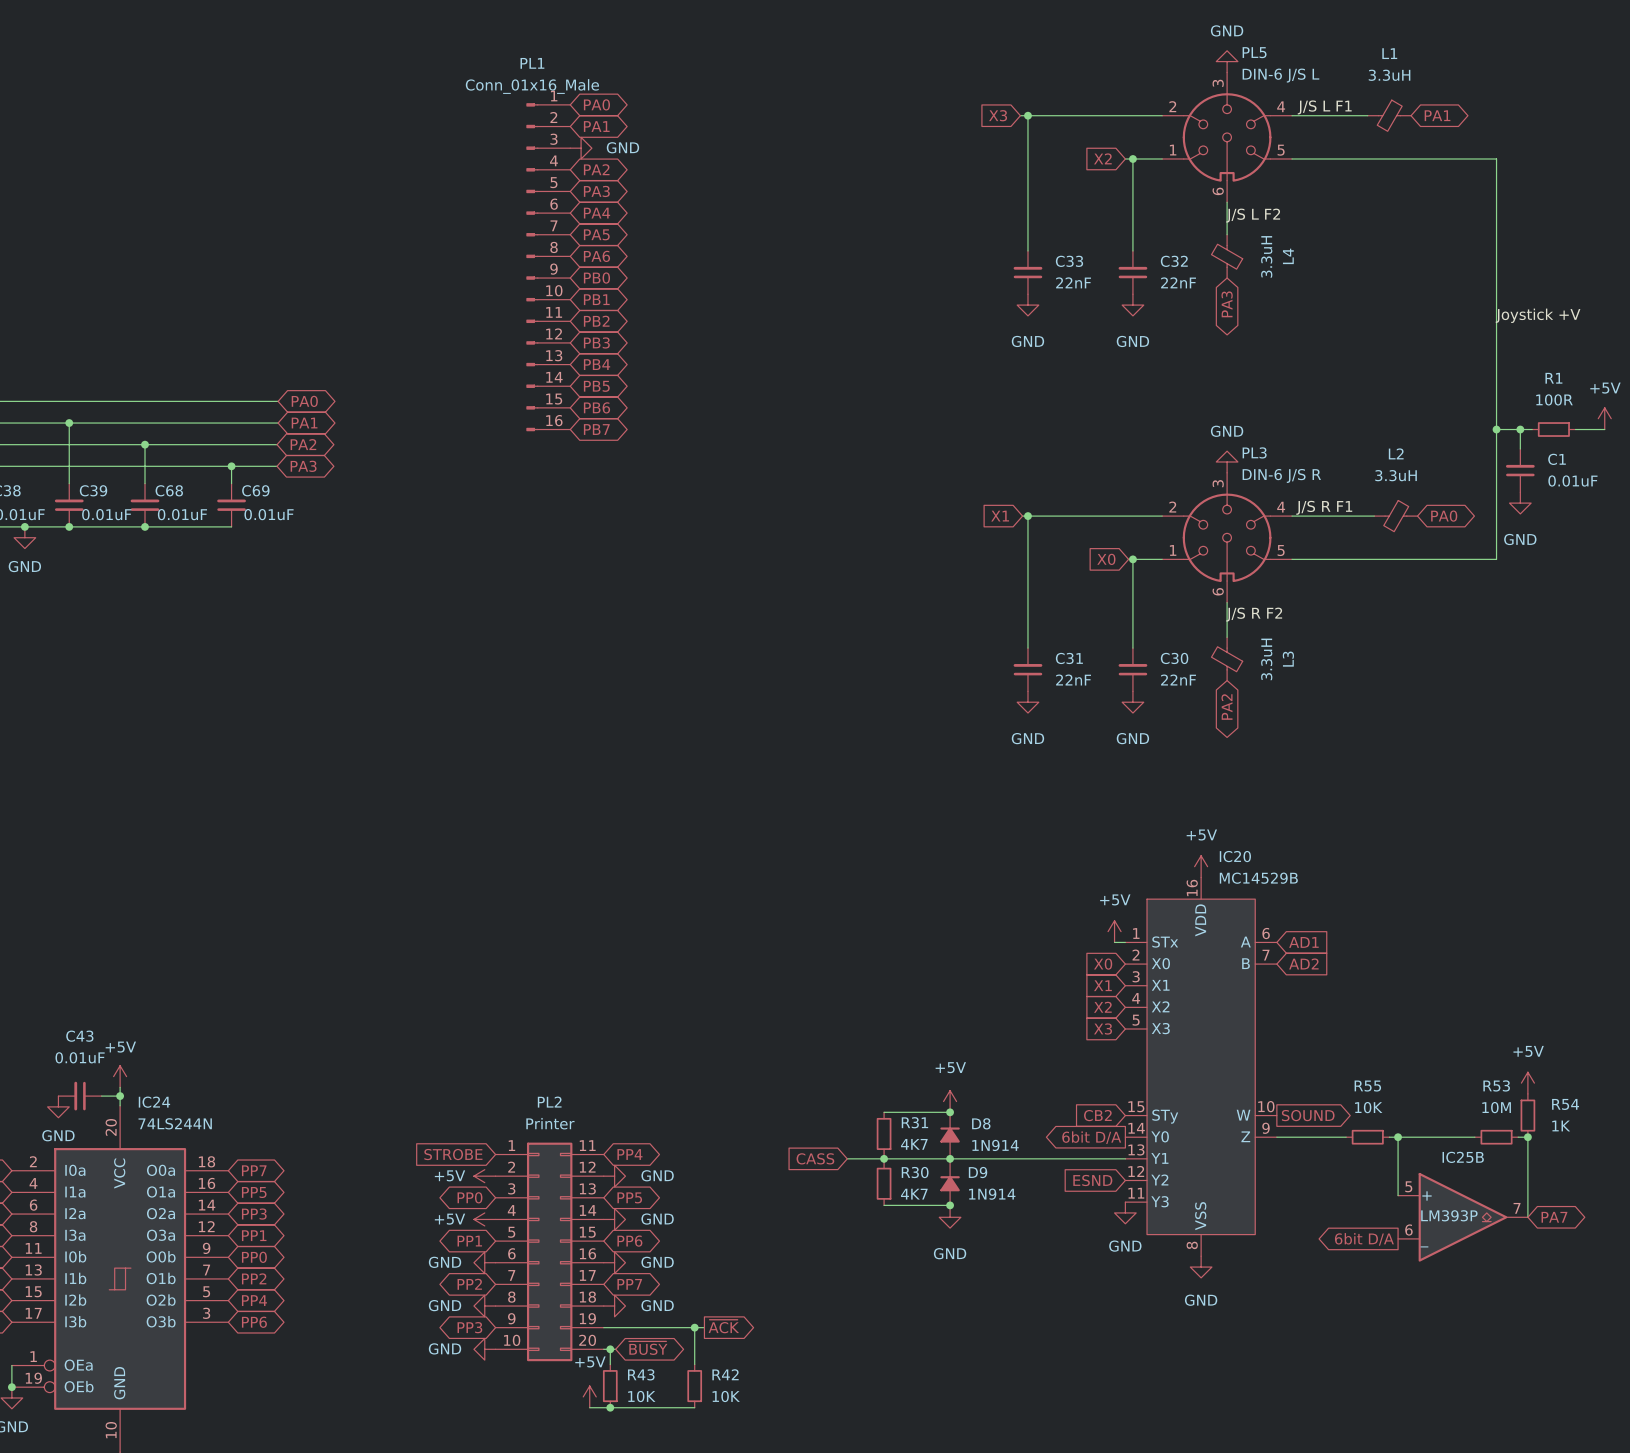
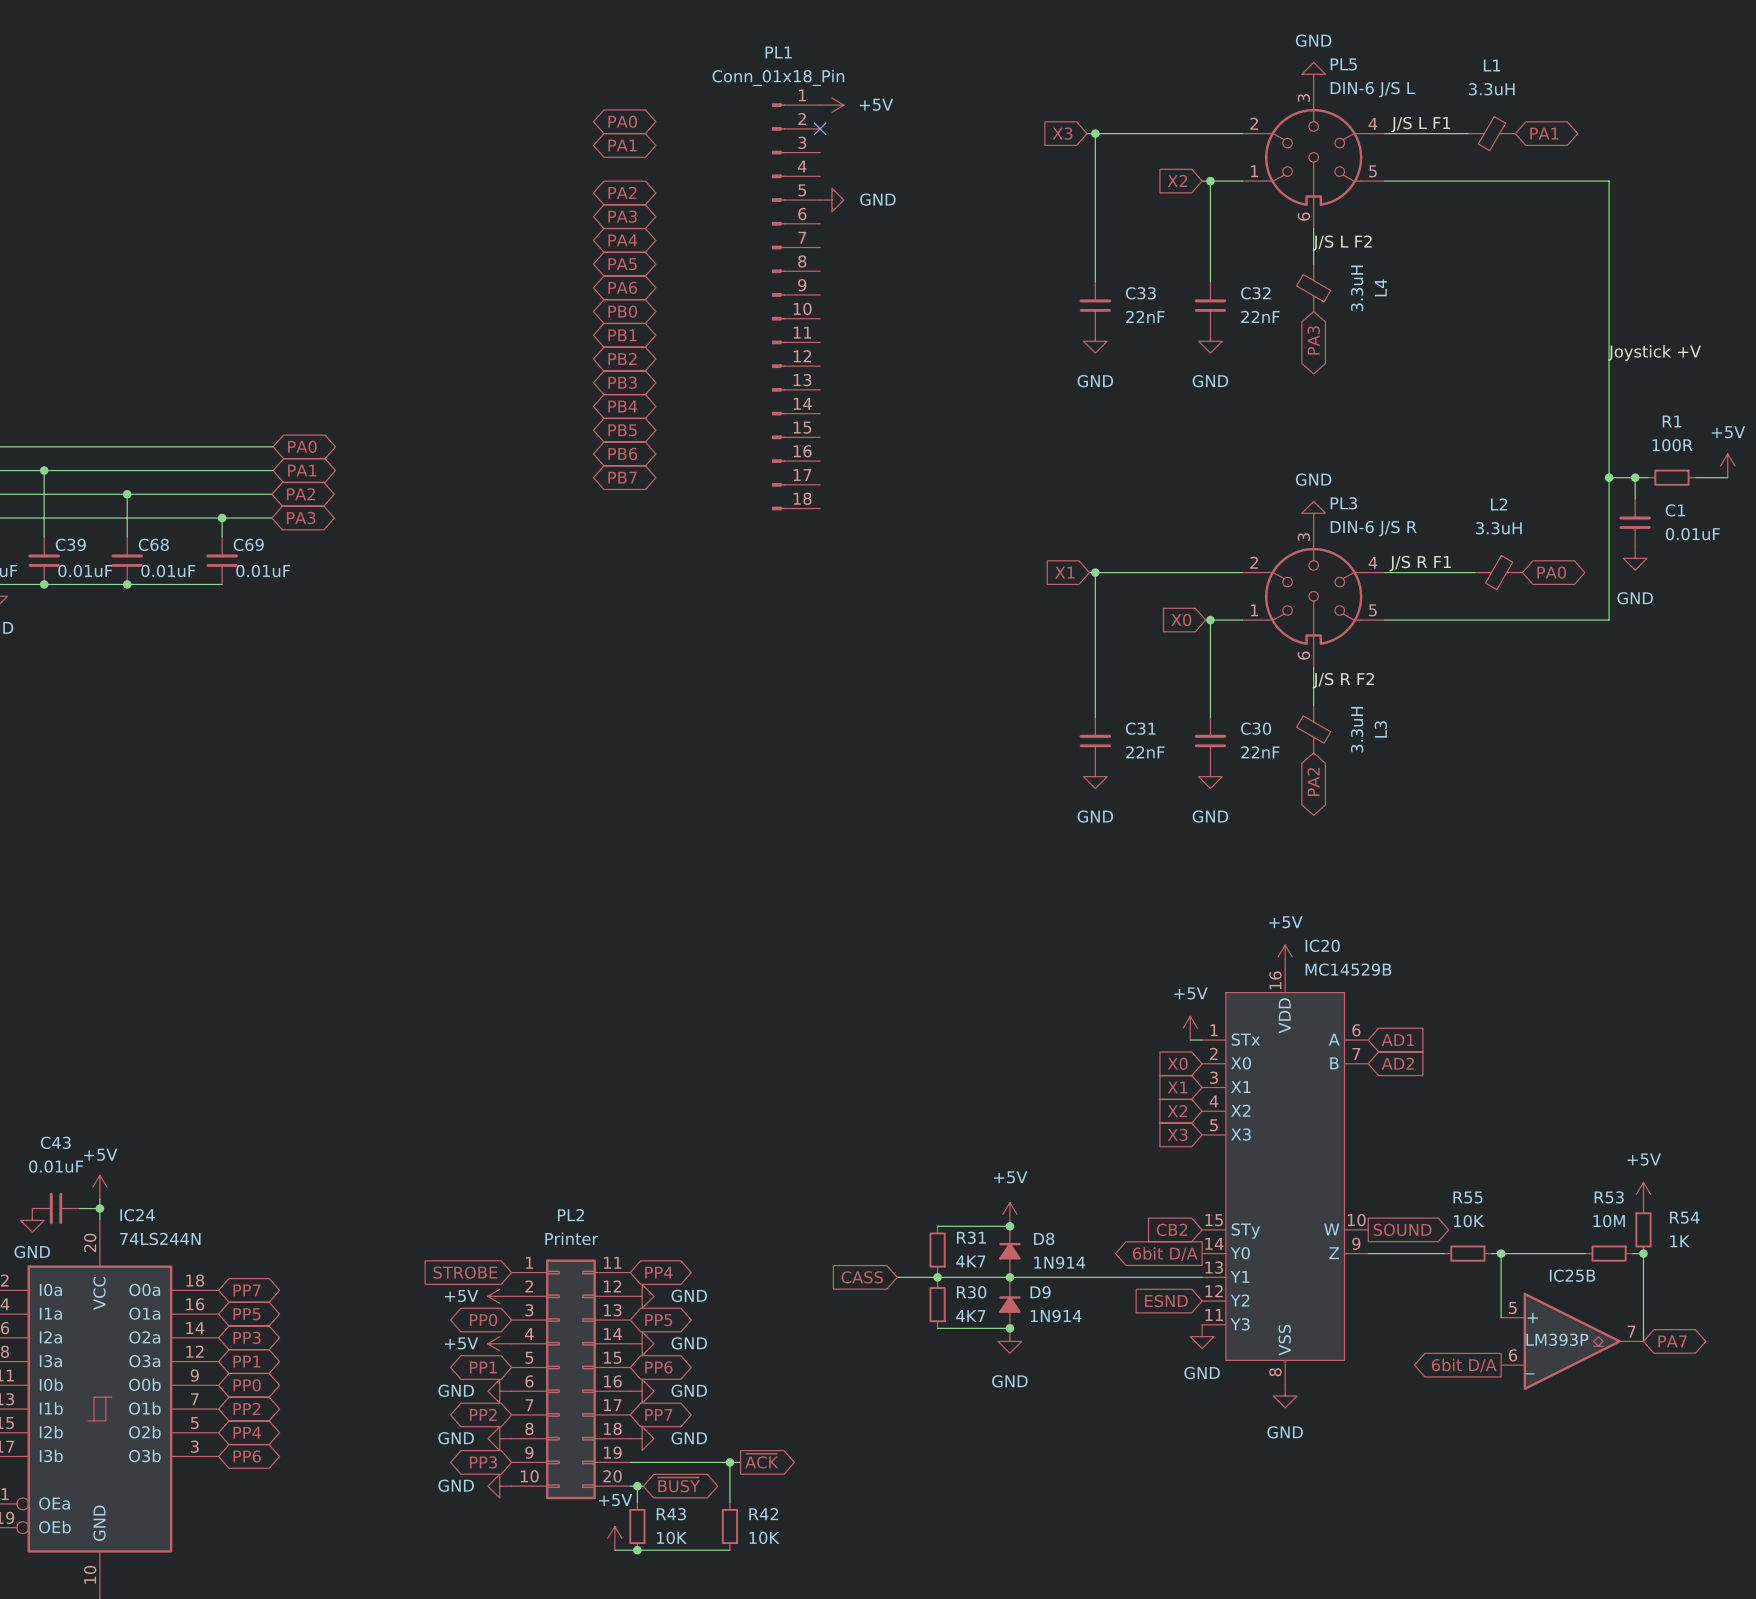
PL1 name position: PL1 (532, 63) -> PL1 (778, 52)
PL1 value: Conn_01x16_Male (532, 86) -> Conn_01x18_Pin (778, 77)
power symbol: none -> +5V (831, 105)
PL1 symbol: [526, 103, 571, 432] -> [771, 103, 821, 511]
no-connect mark: none -> (820, 128)
power symbol position: GND (581, 148) -> GND (831, 200)

